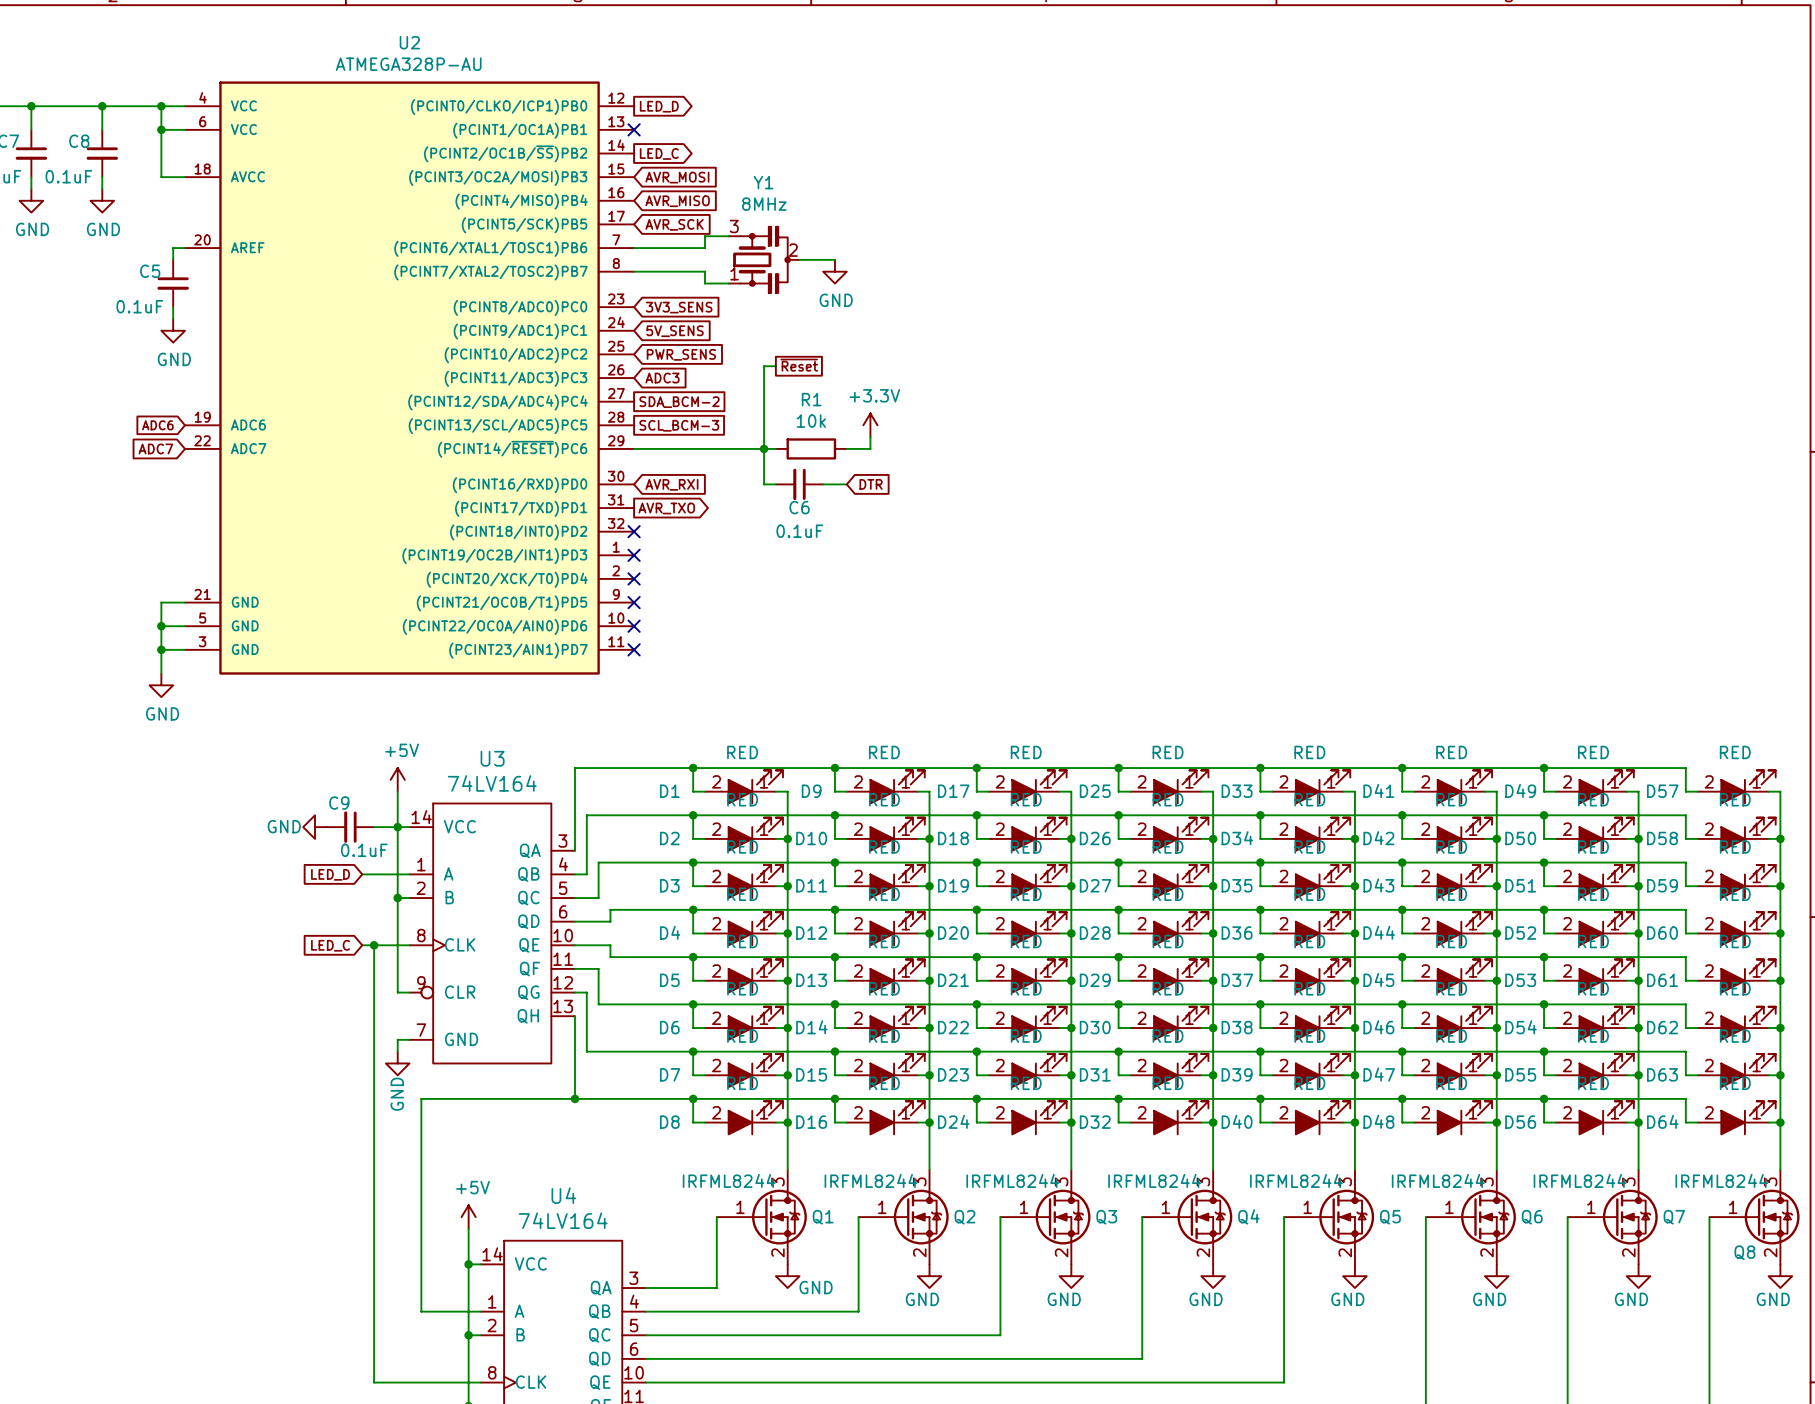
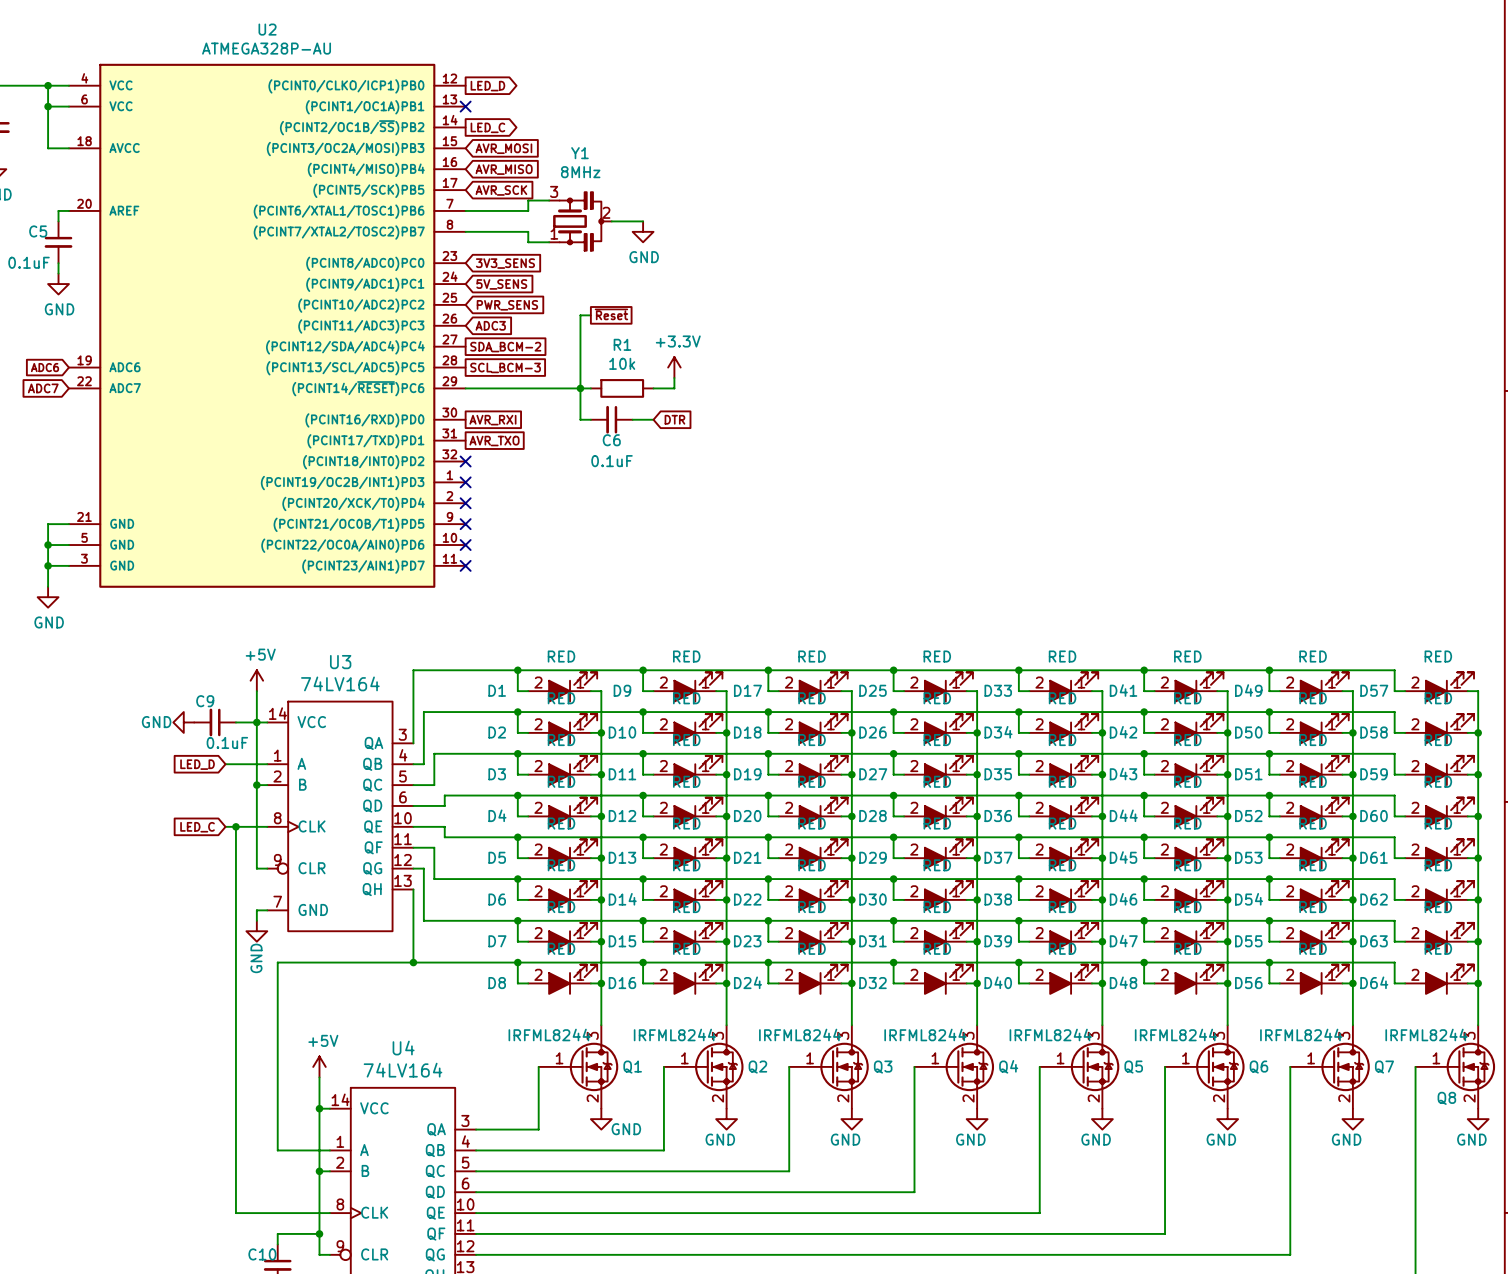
global label shape: input (671, 484) -> passive (492, 420)
global label shape: output (666, 508) -> passive (494, 441)

